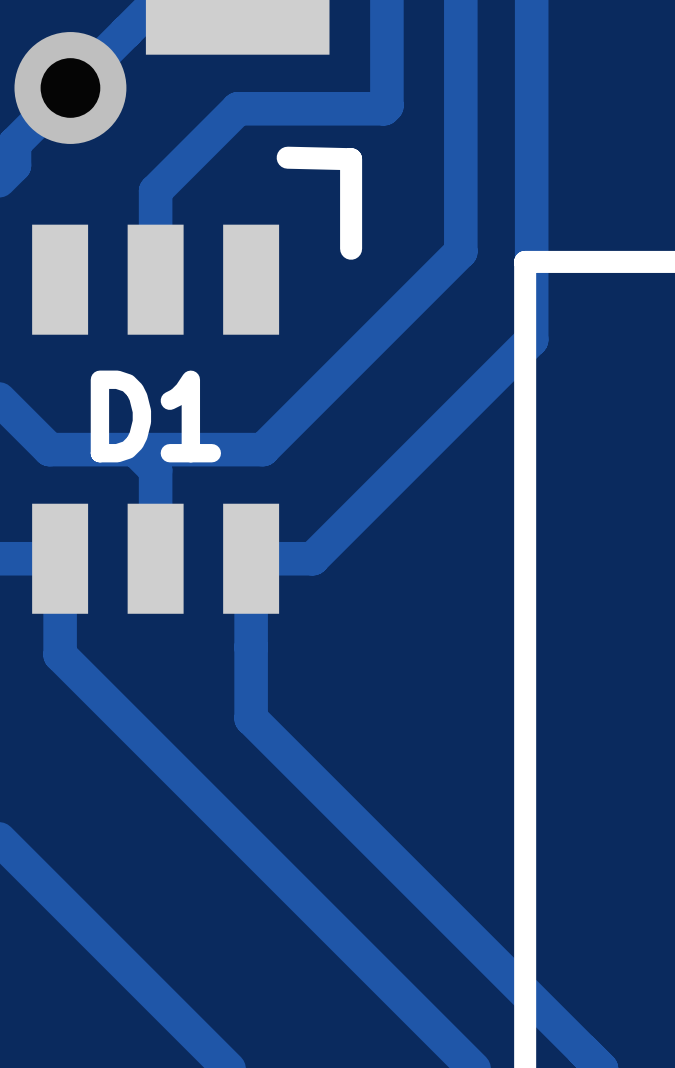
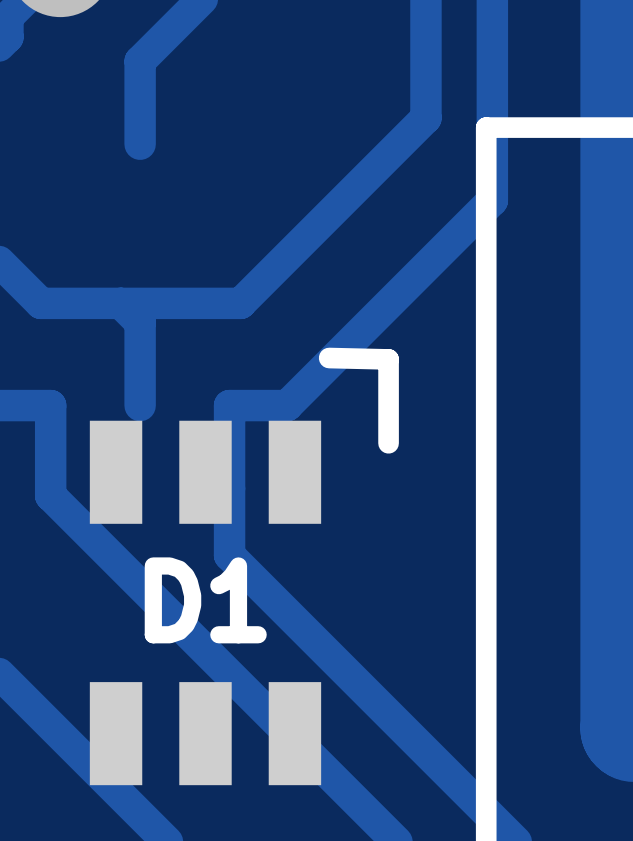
D1 position: (197, 380) -> (244, 566)

